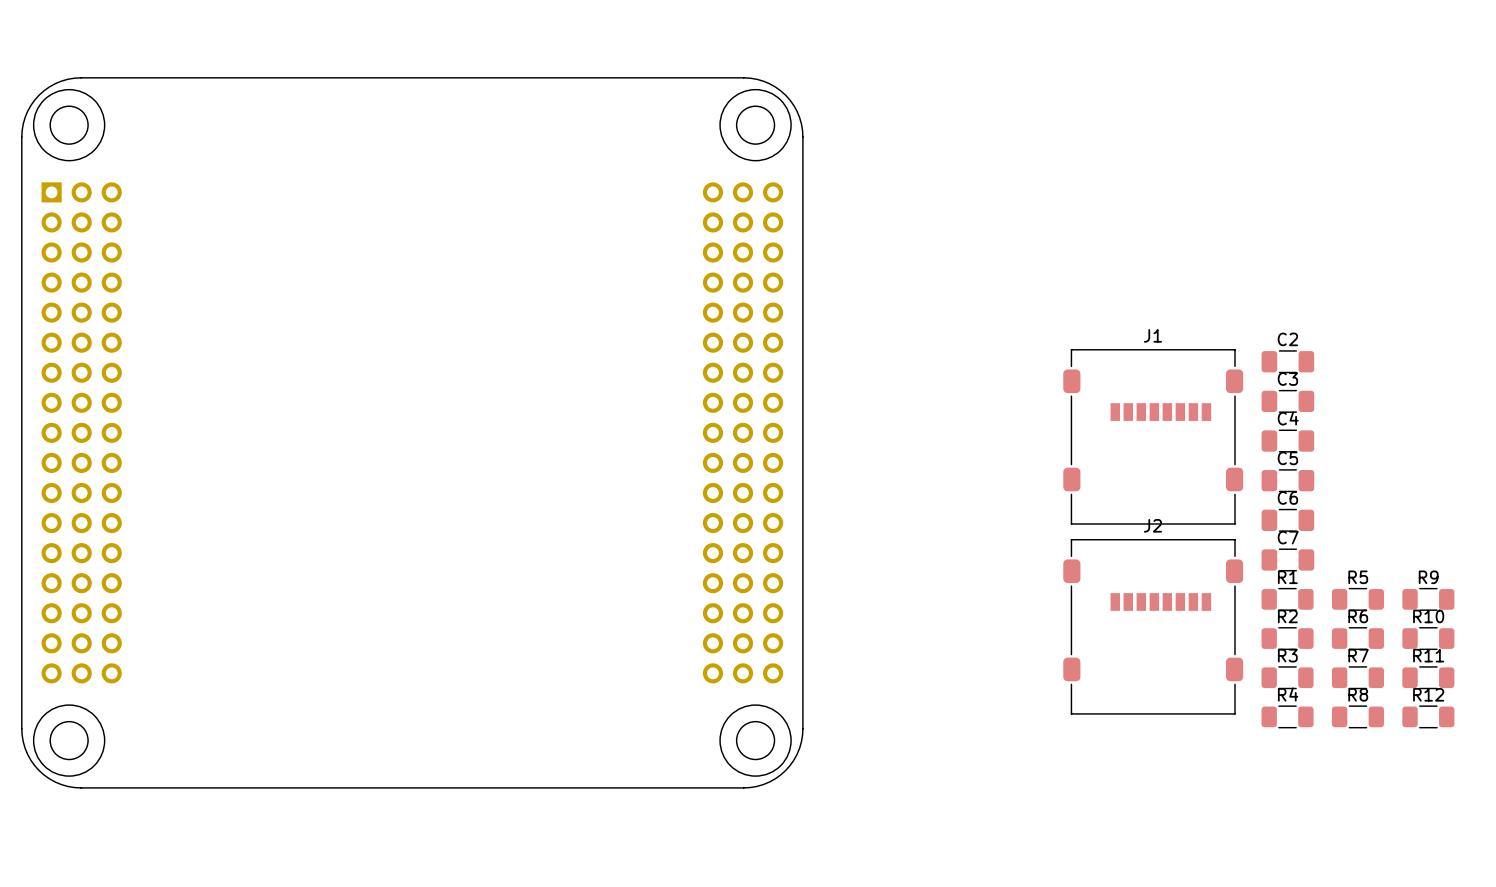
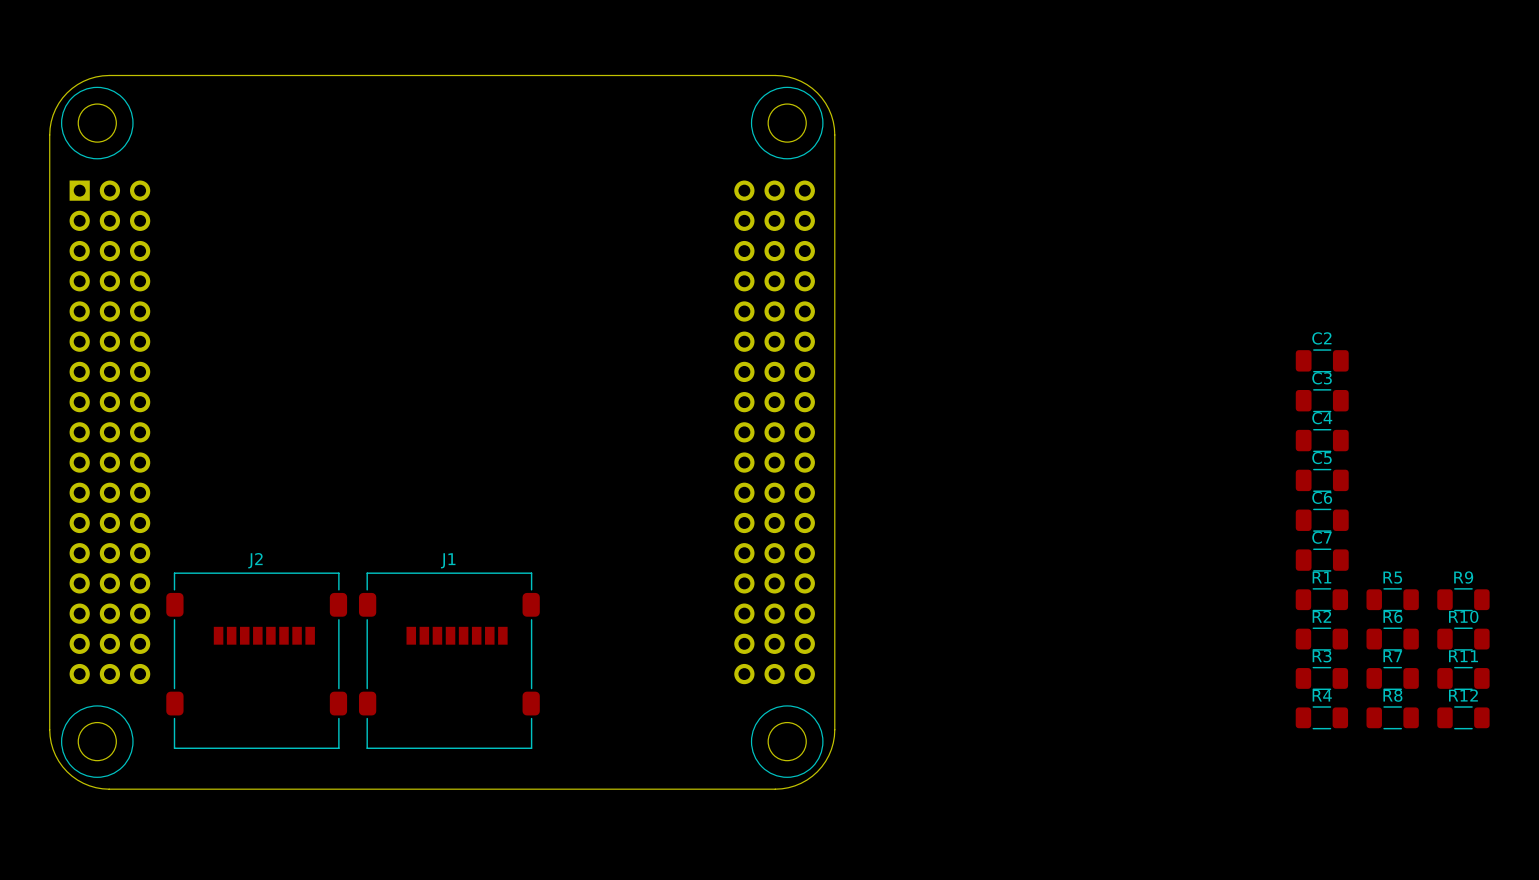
J1 position: (1153, 436) -> (449, 660)
J2 position: (1153, 626) -> (256, 660)

